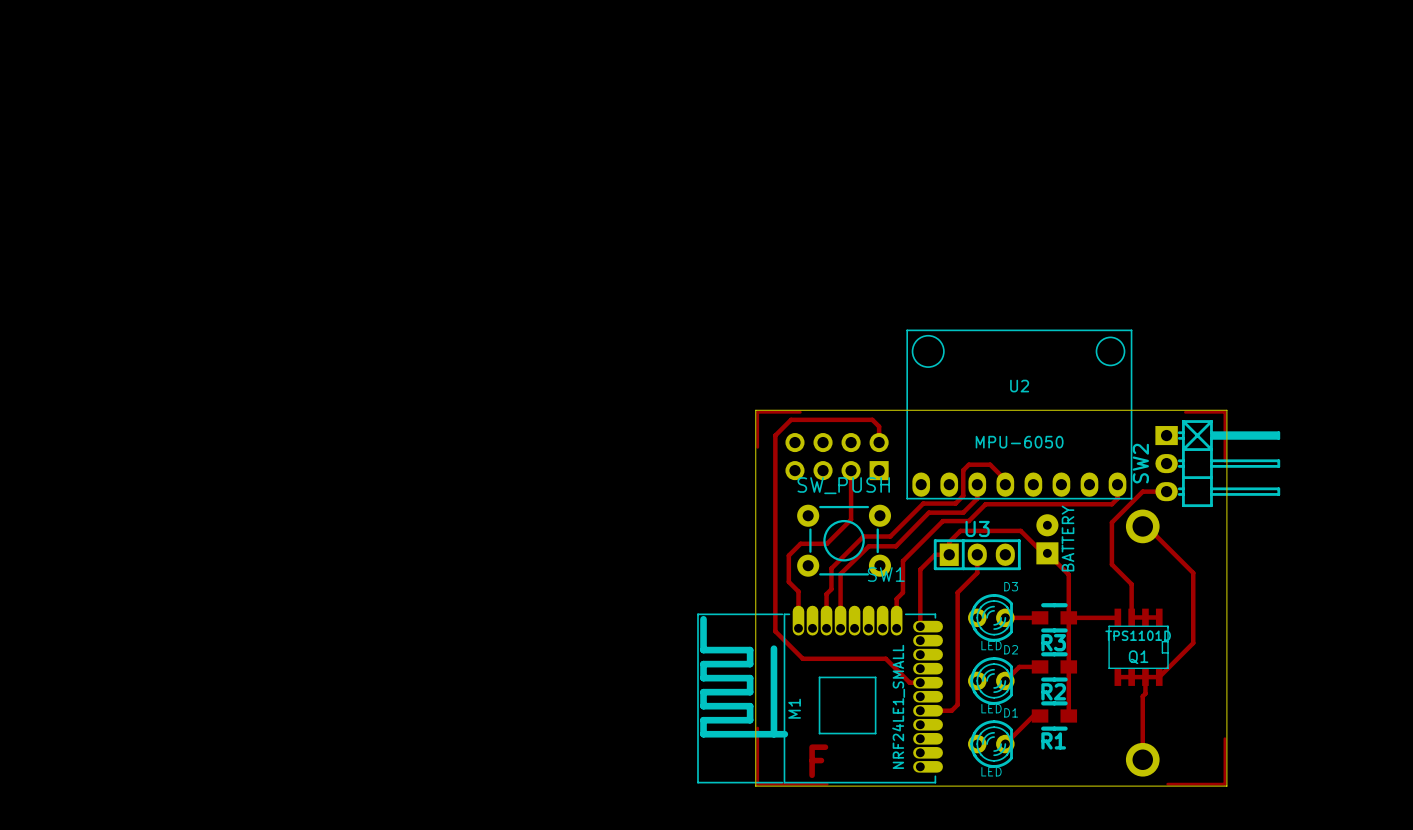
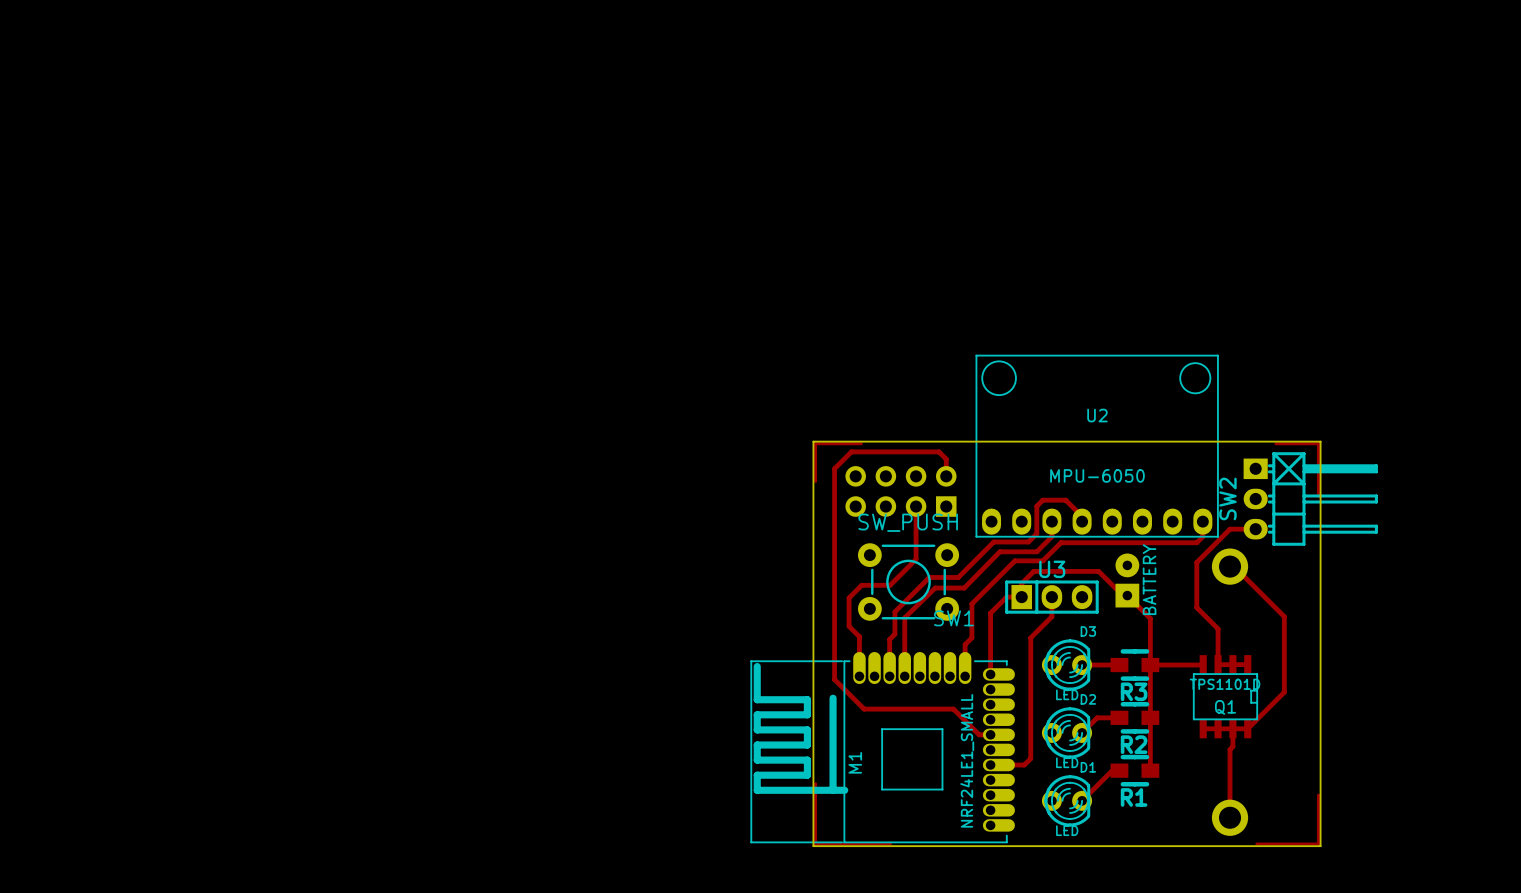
text: F (818, 761) -> none

